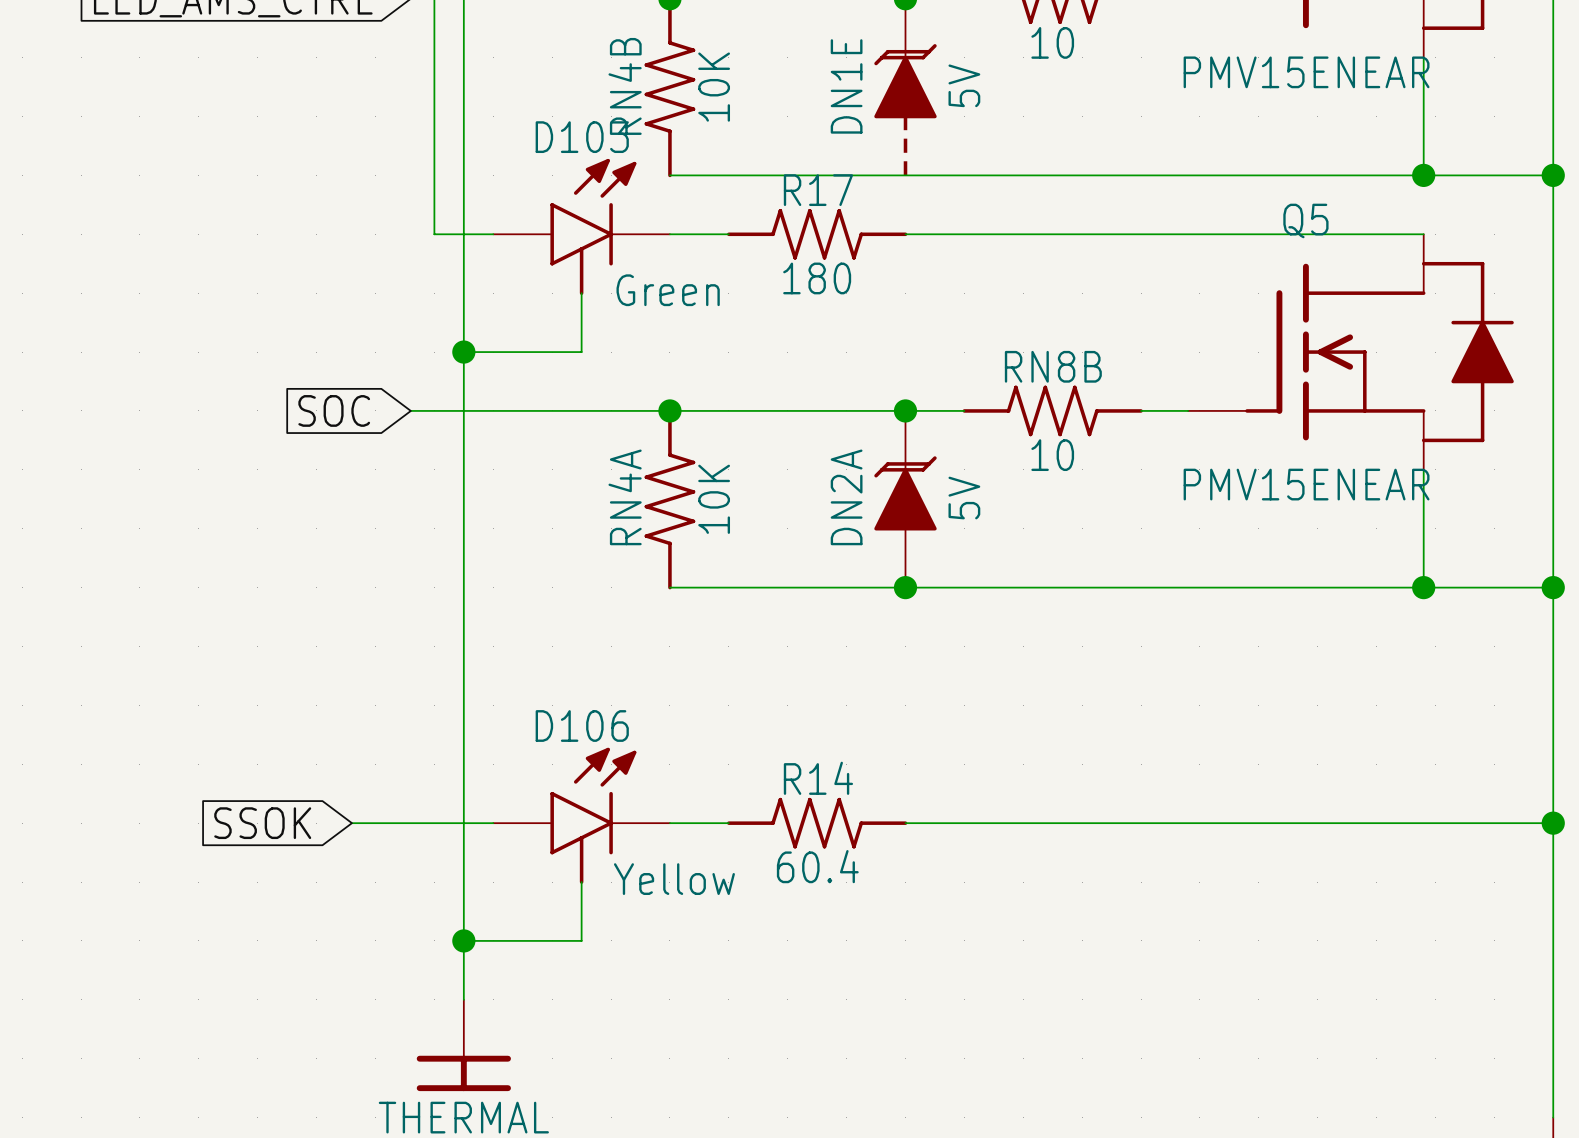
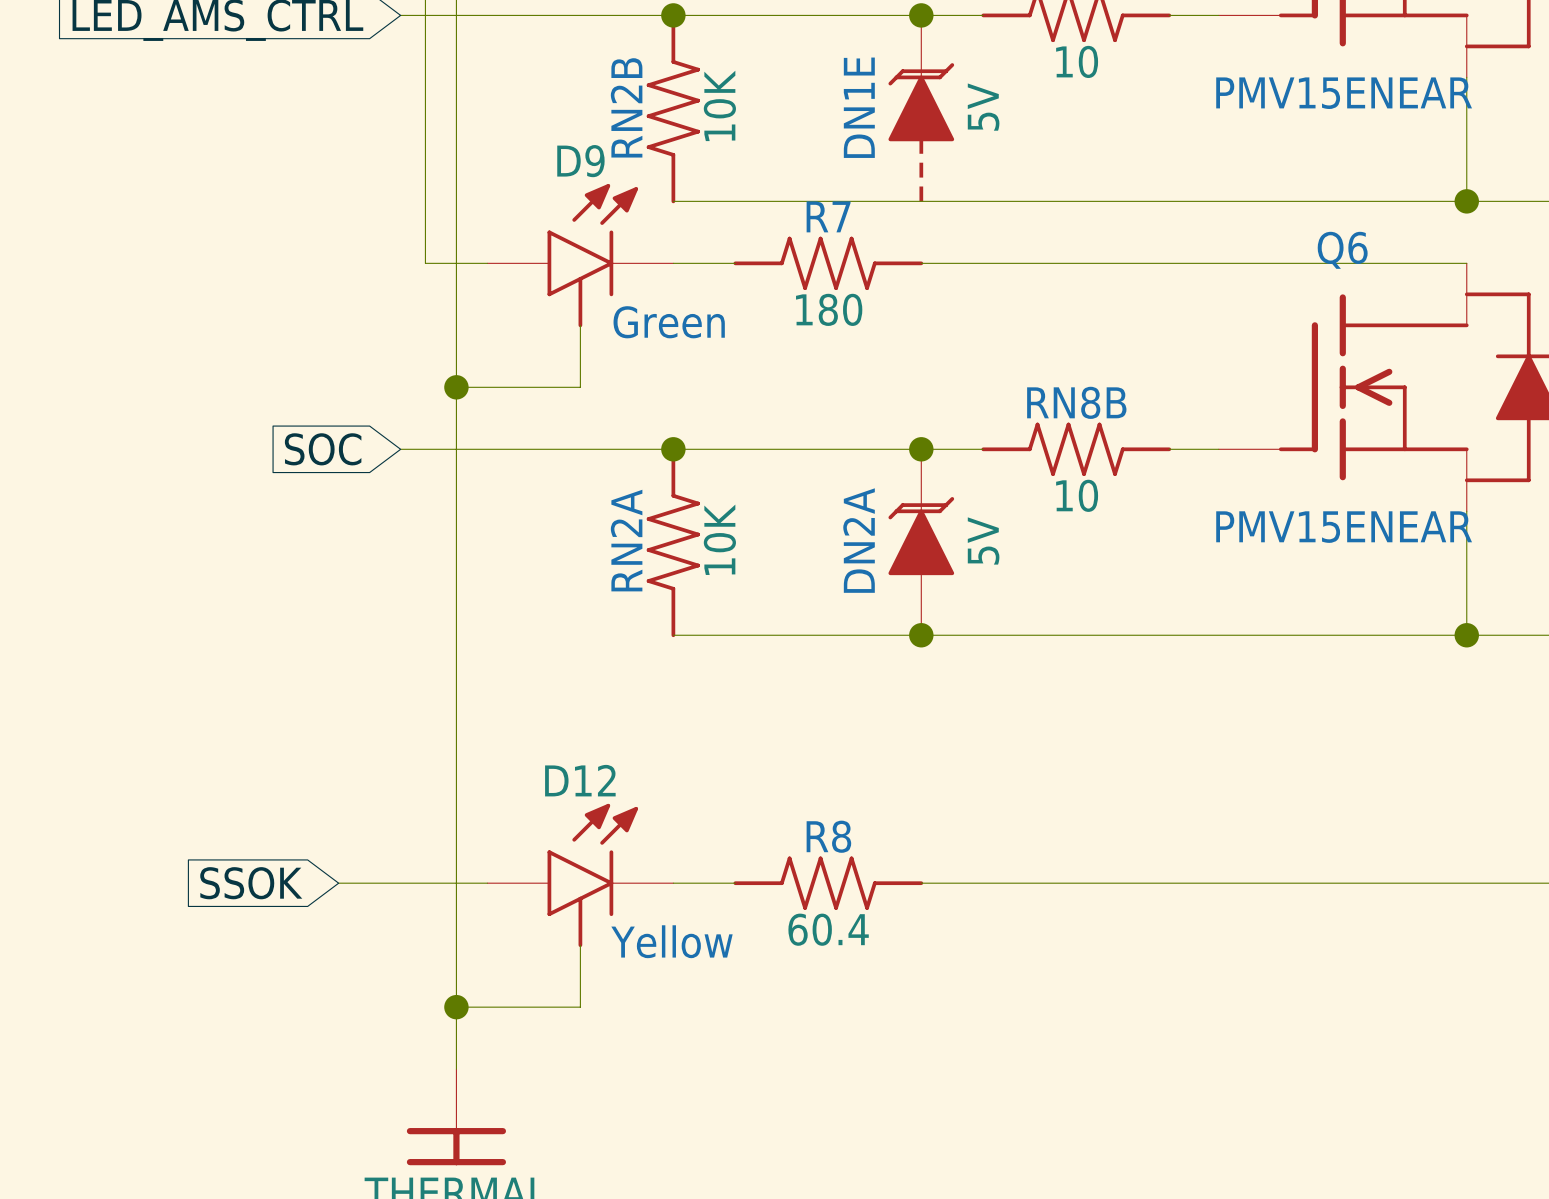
RN4B name: RN4B (625, 86) -> RN2B (626, 107)
D103 name: D103 (582, 137) -> D9 (580, 161)
R17 name: R17 (818, 190) -> R7 (828, 216)
Q5 name: Q5 (1305, 220) -> Q6 (1342, 250)
RN4A name: RN4A (625, 497) -> RN2A (626, 540)
D106 name: D106 (582, 725) -> D12 (580, 780)
R14 name: R14 (818, 778) -> R8 (828, 836)

